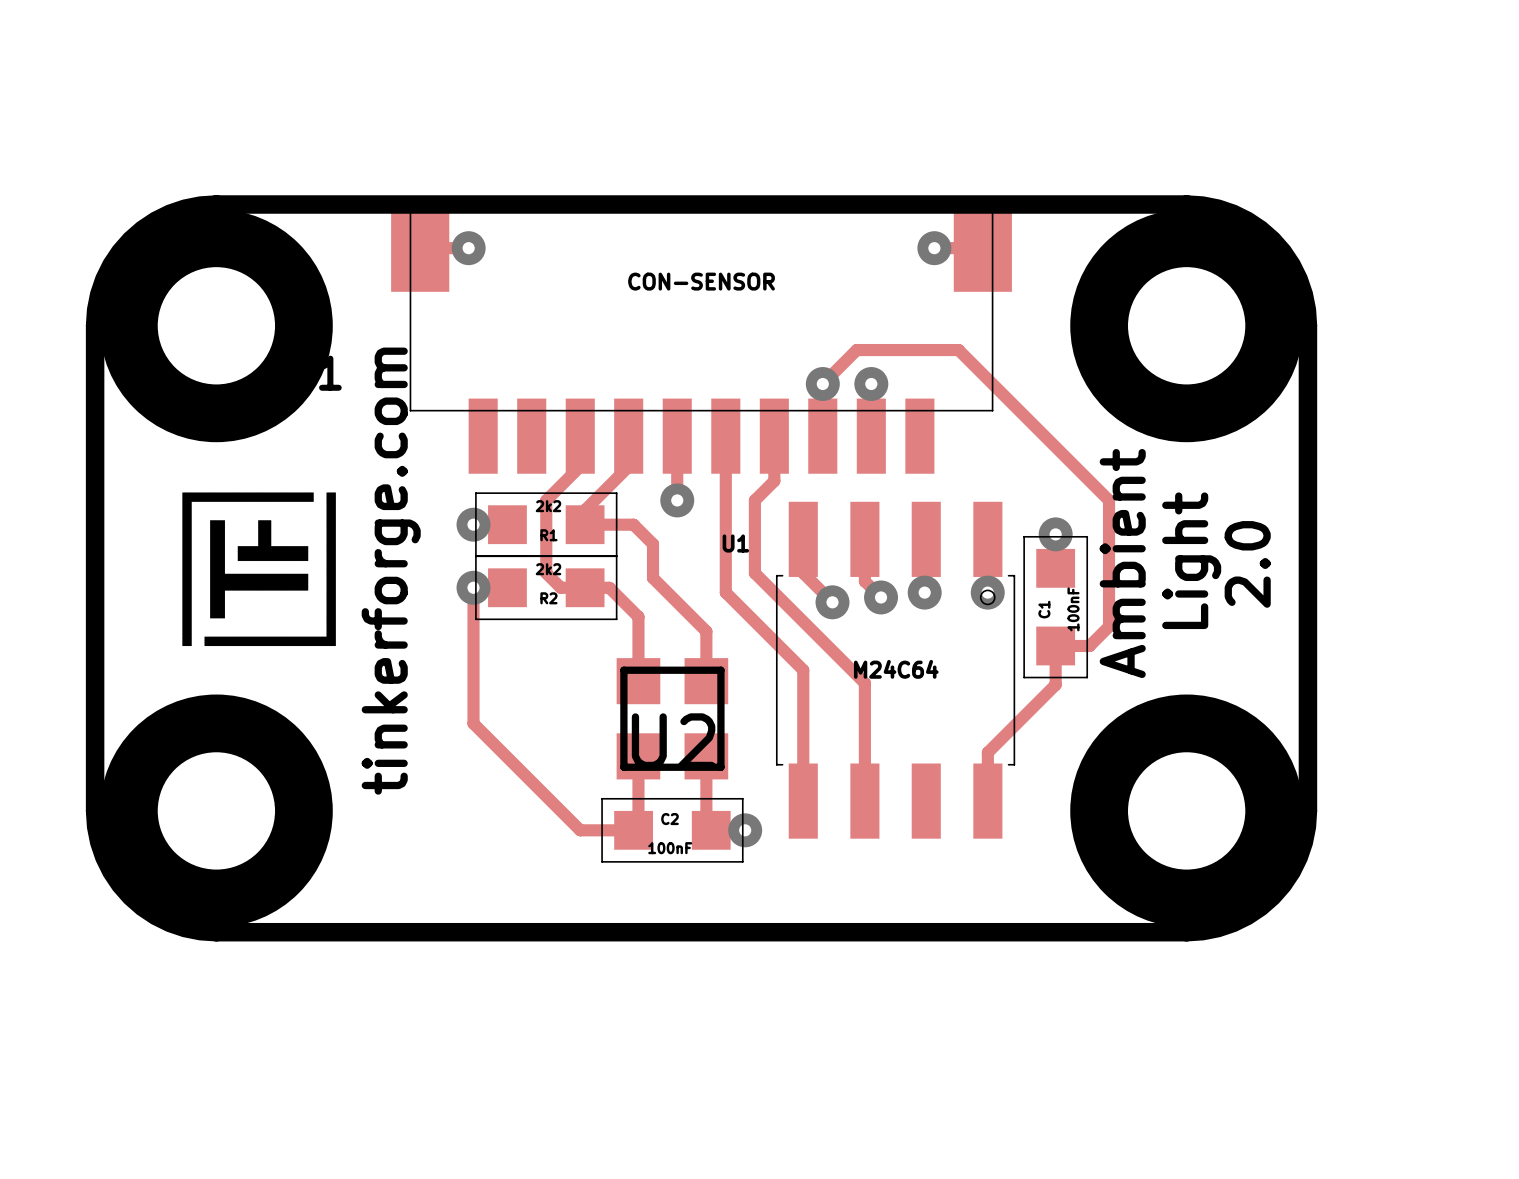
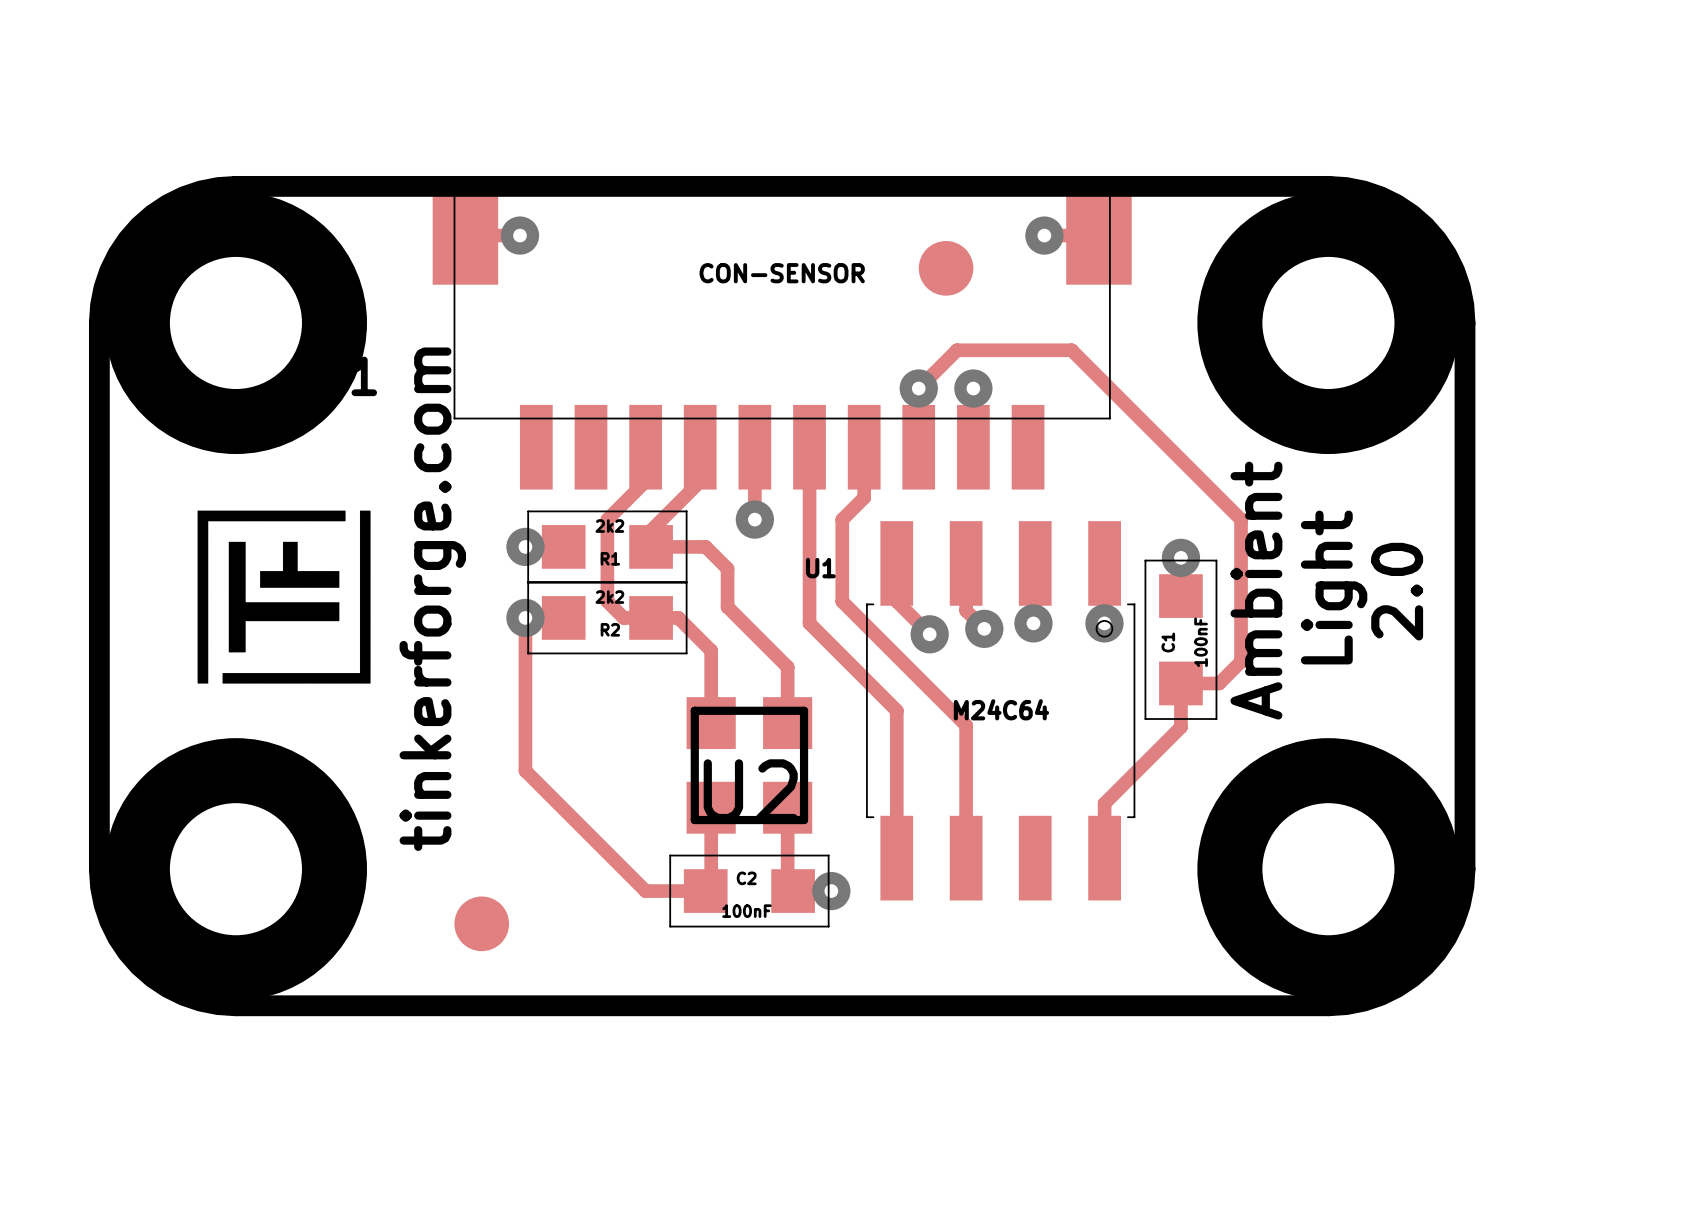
part: none -> (946, 268)
part: none -> (481, 923)

